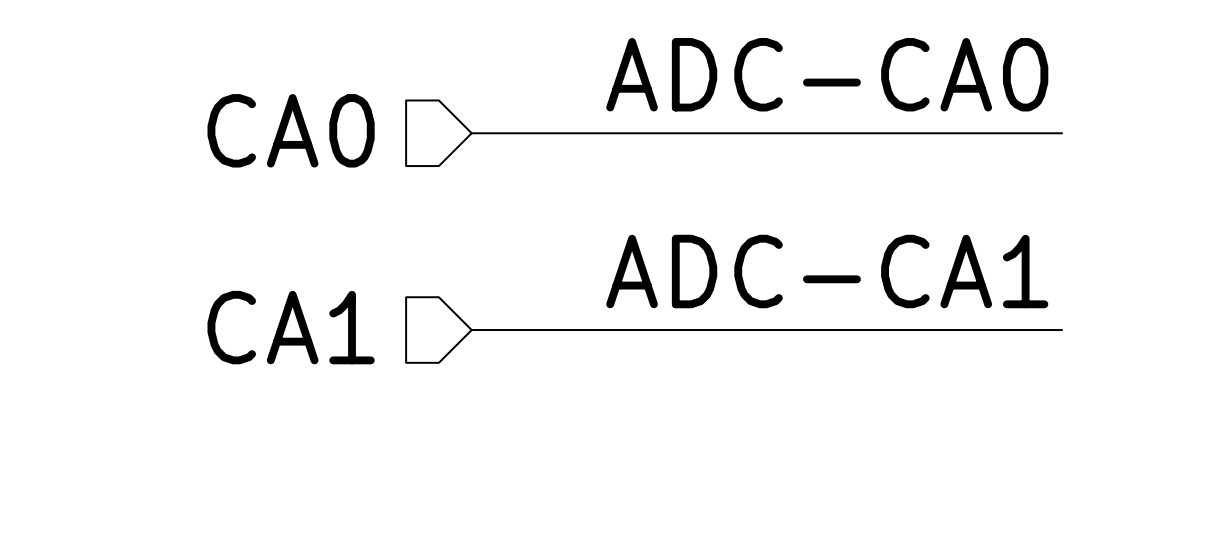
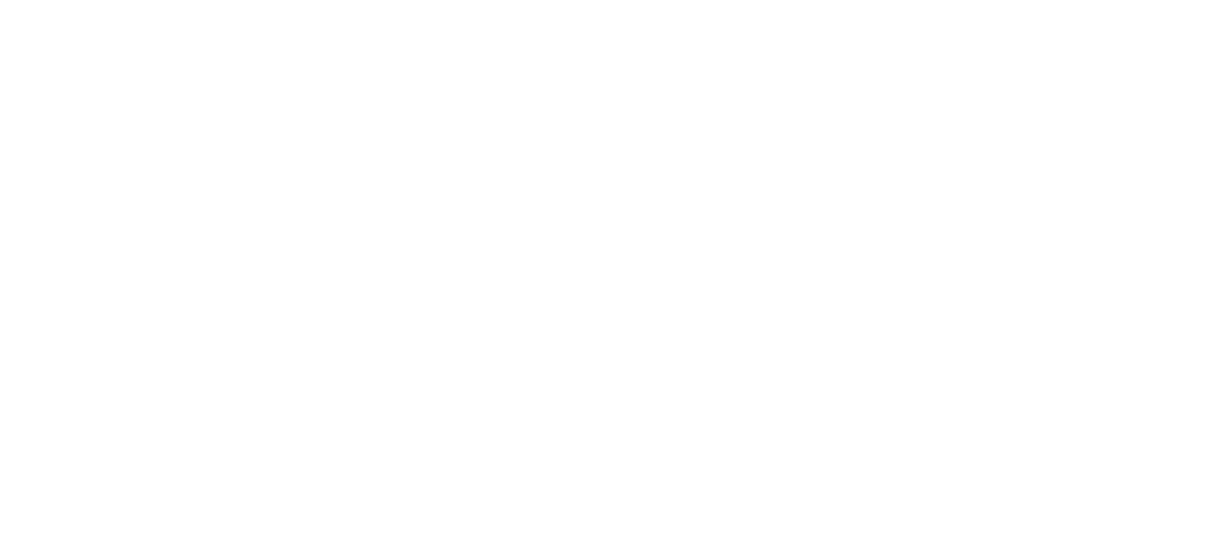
label: ADC-CA0 (827, 74) -> none
hierarchical label: CA0 (291, 130) -> none
wire: (471, 133) (1062, 133) -> none
label: ADC-CA1 (827, 271) -> none
hierarchical label: CA1 (291, 327) -> none
wire: (471, 330) (1062, 330) -> none

